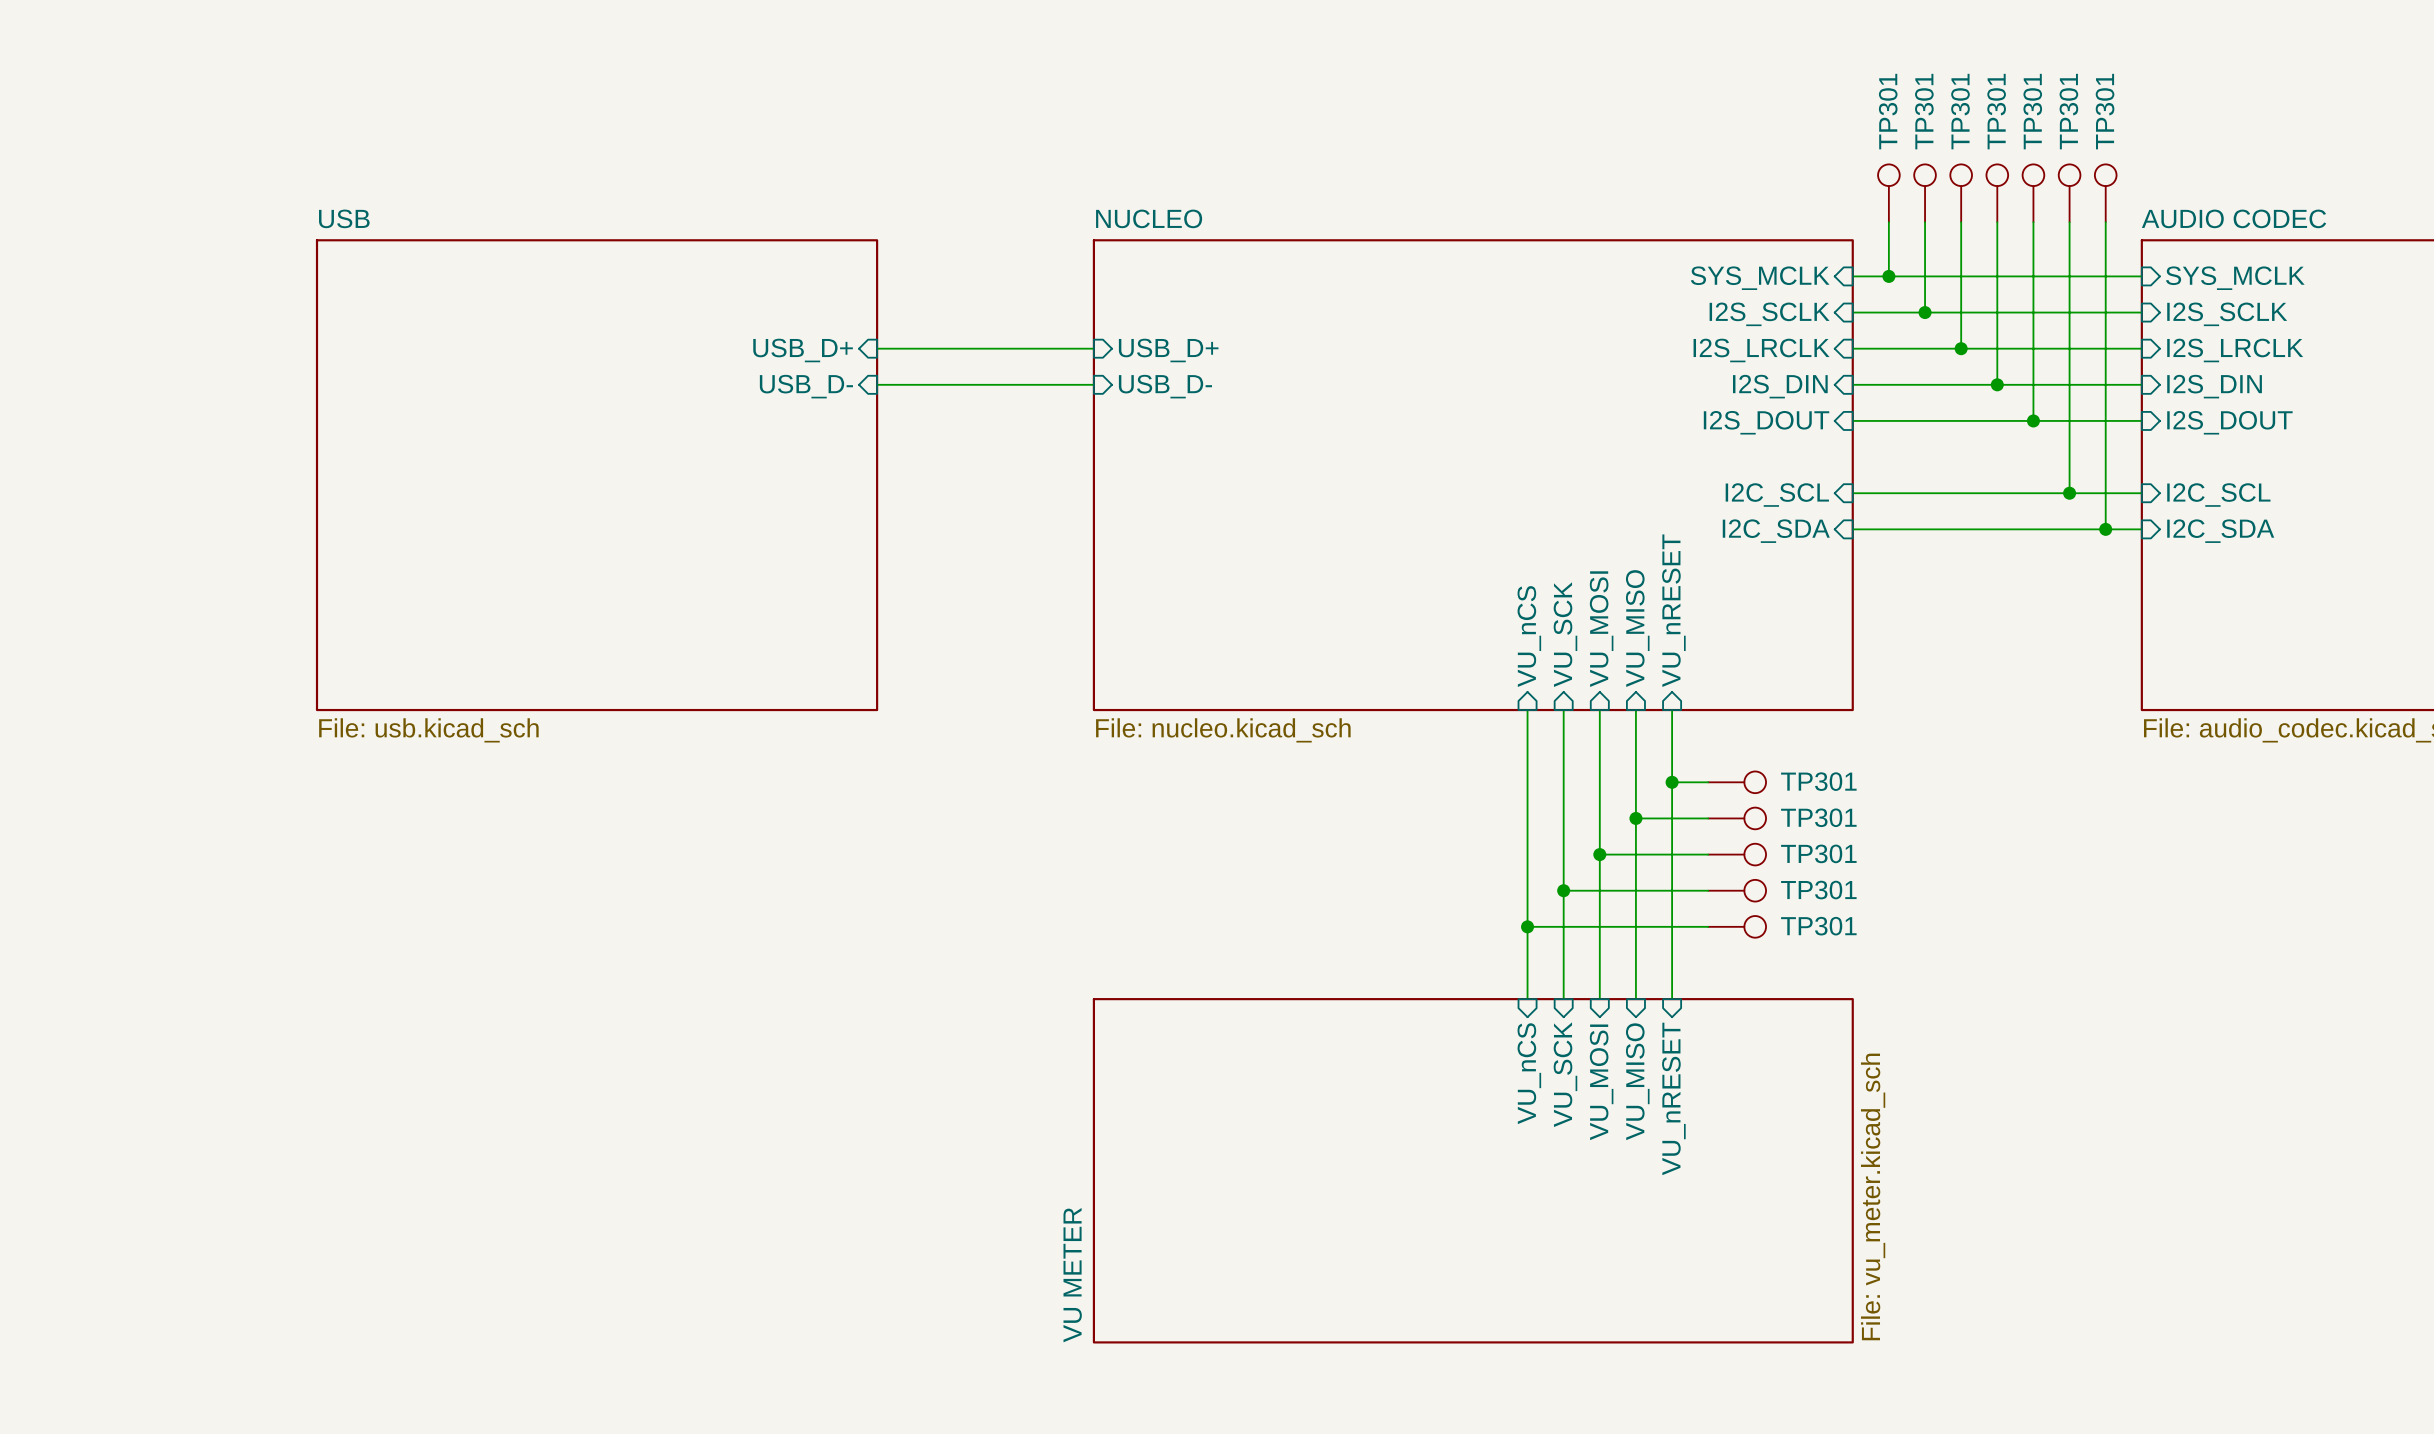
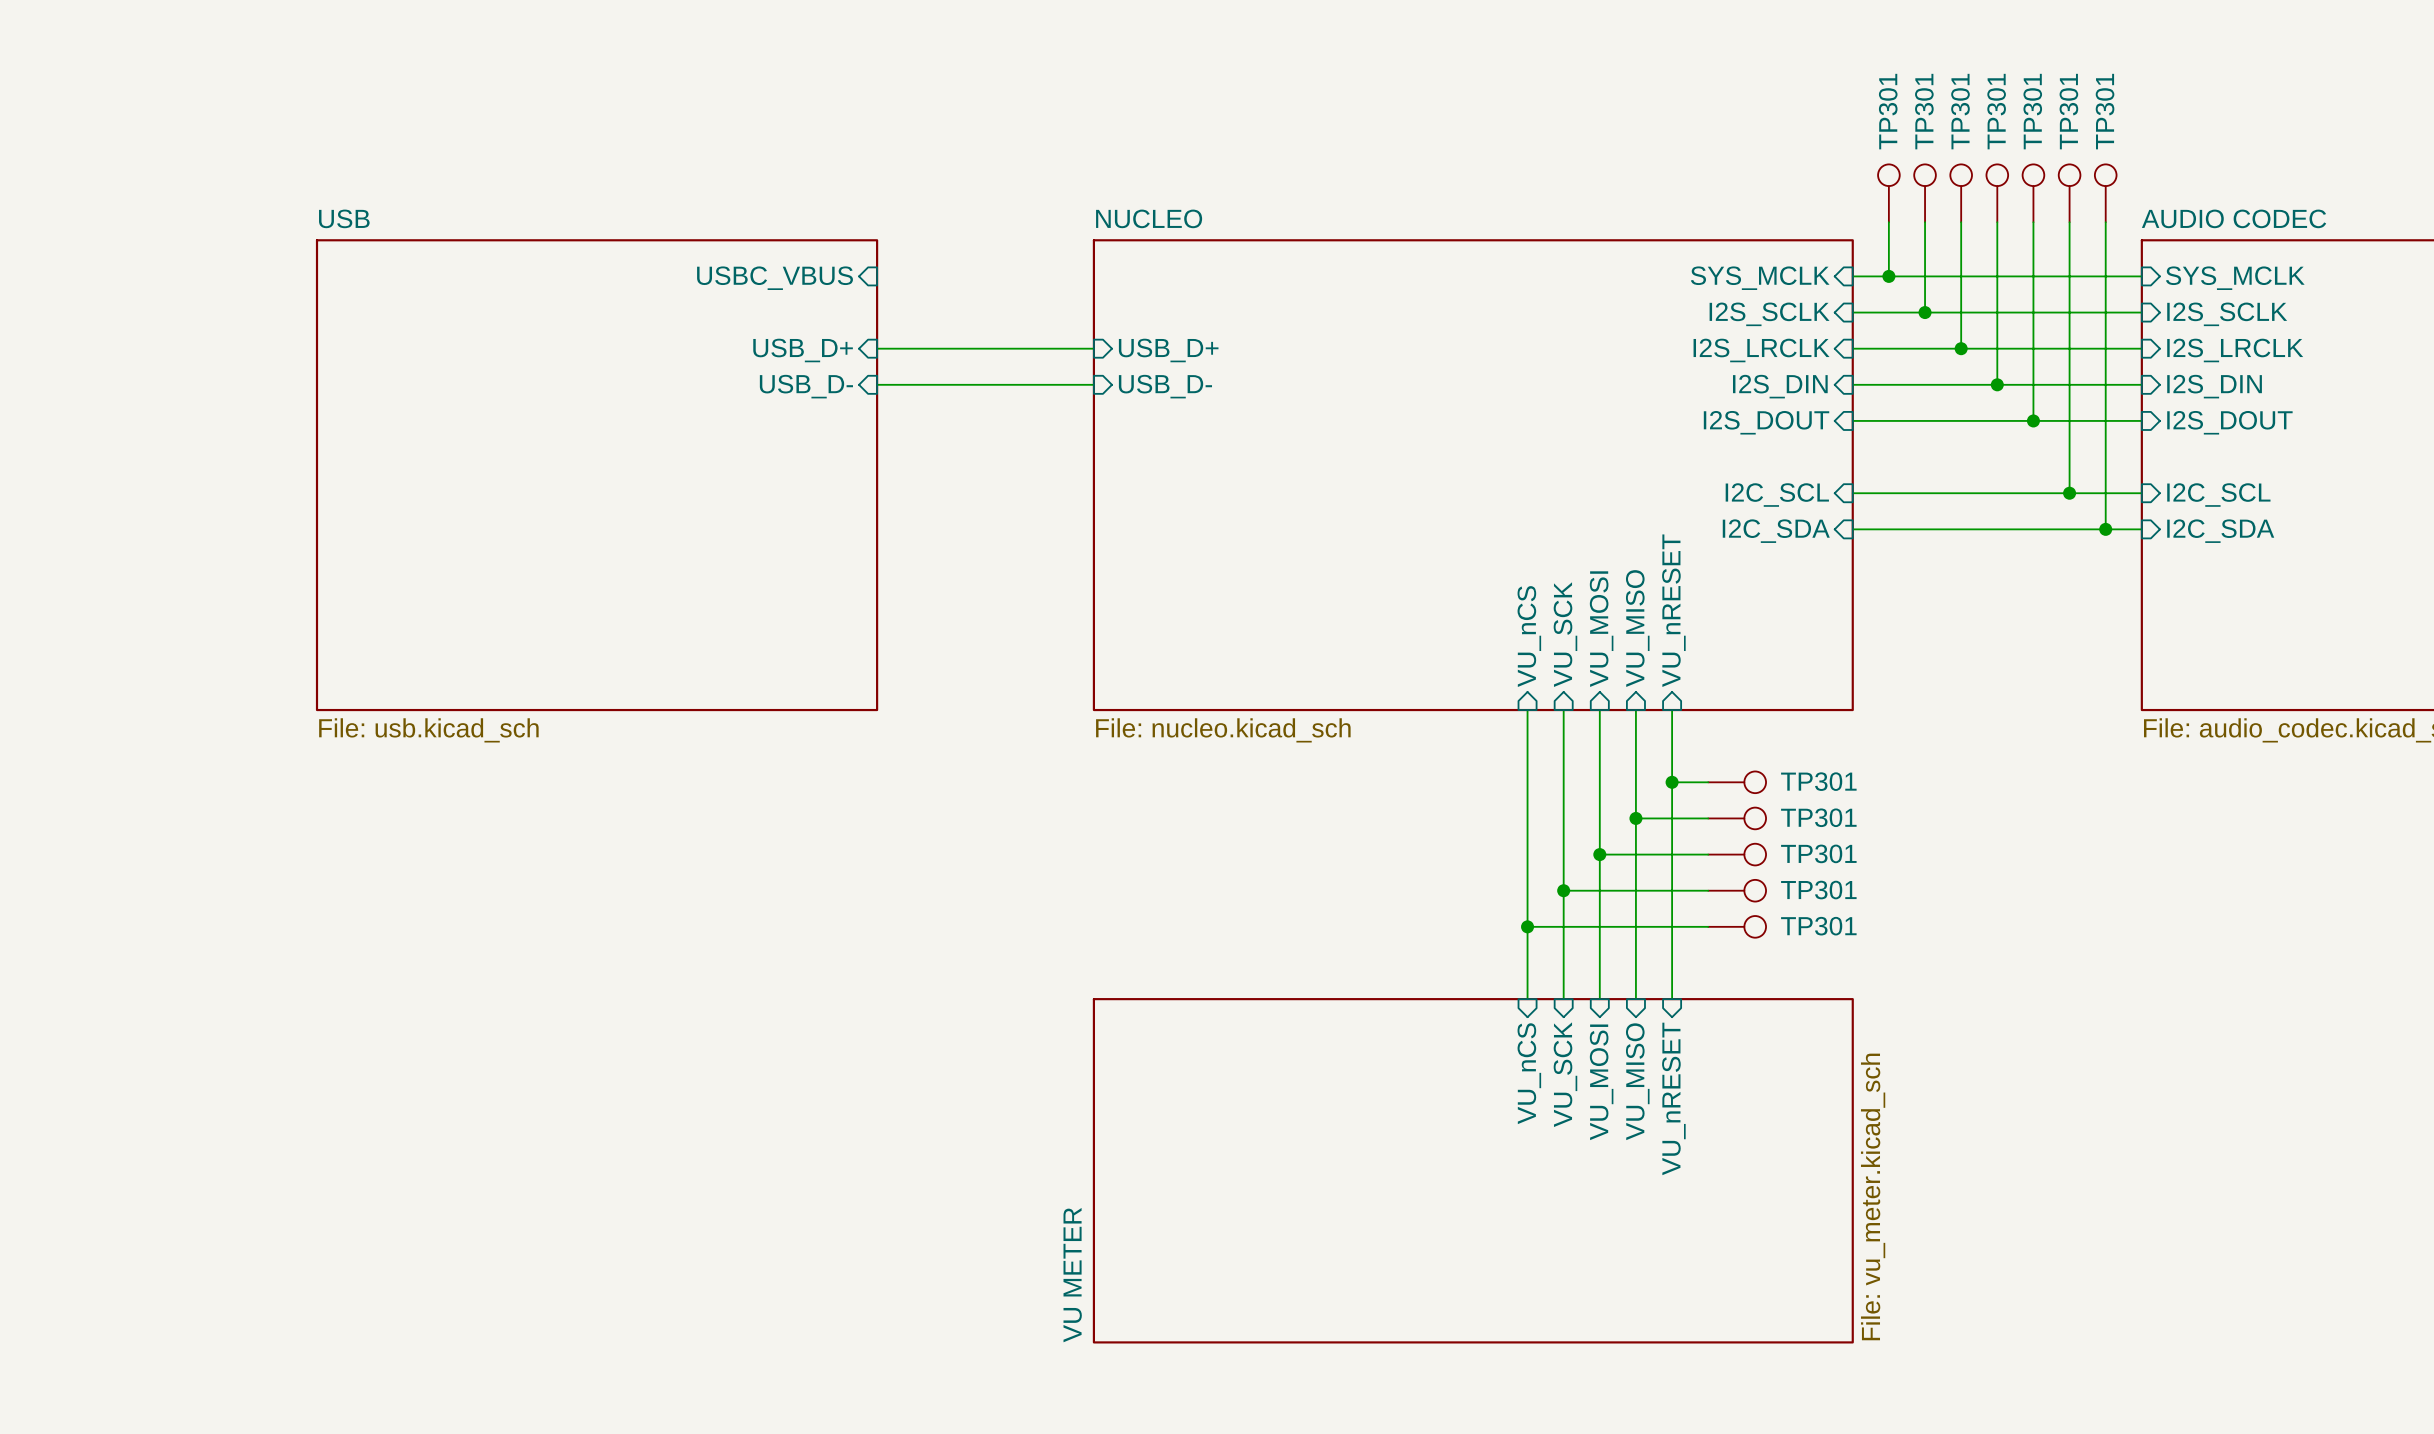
sheet pin: none -> USBC_VBUS (775, 278)

